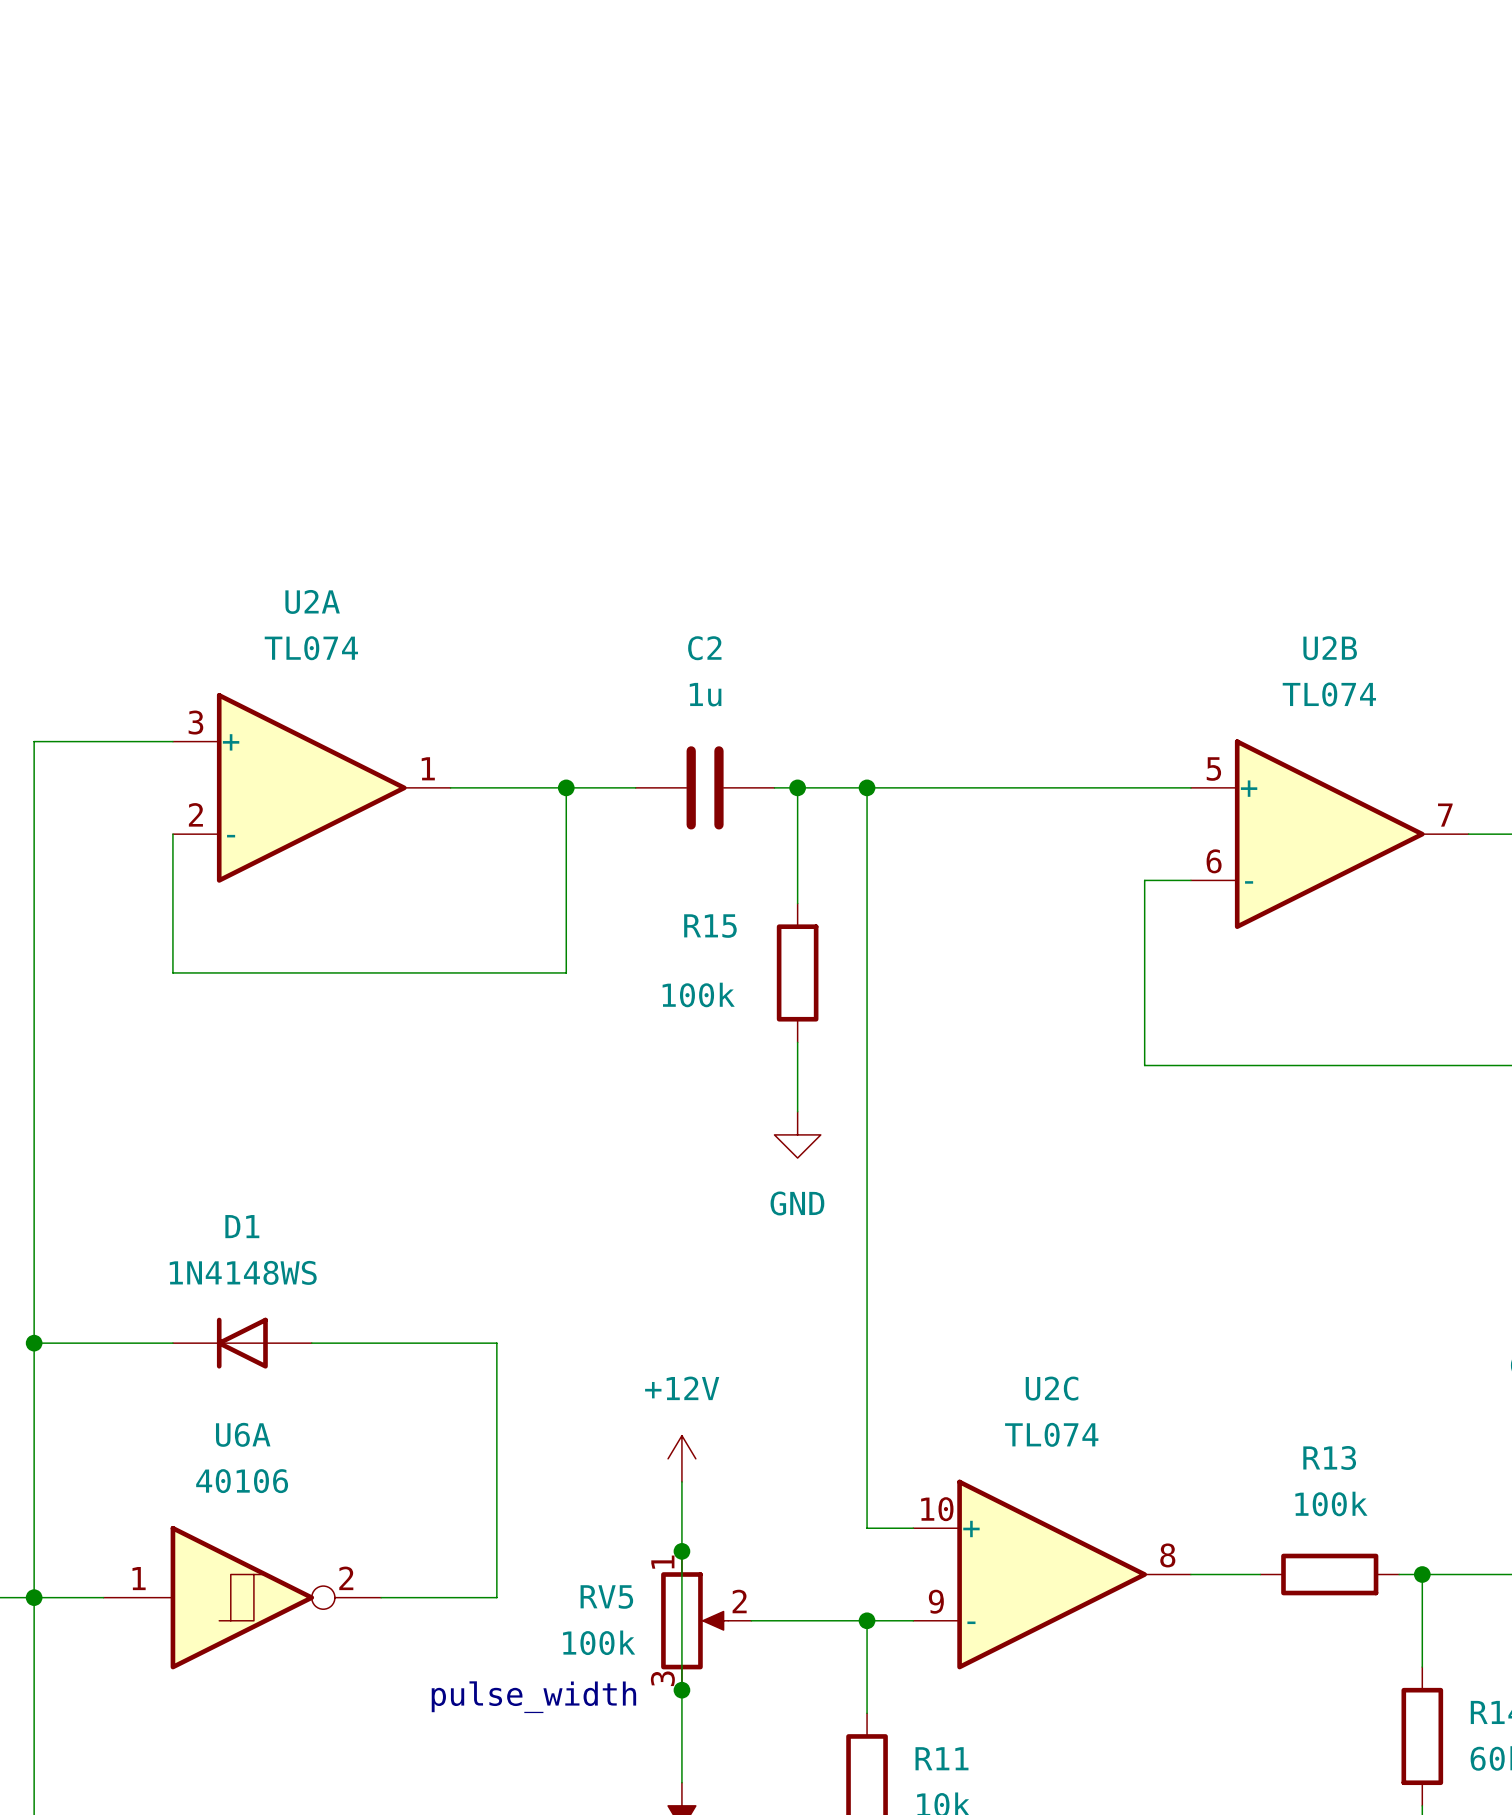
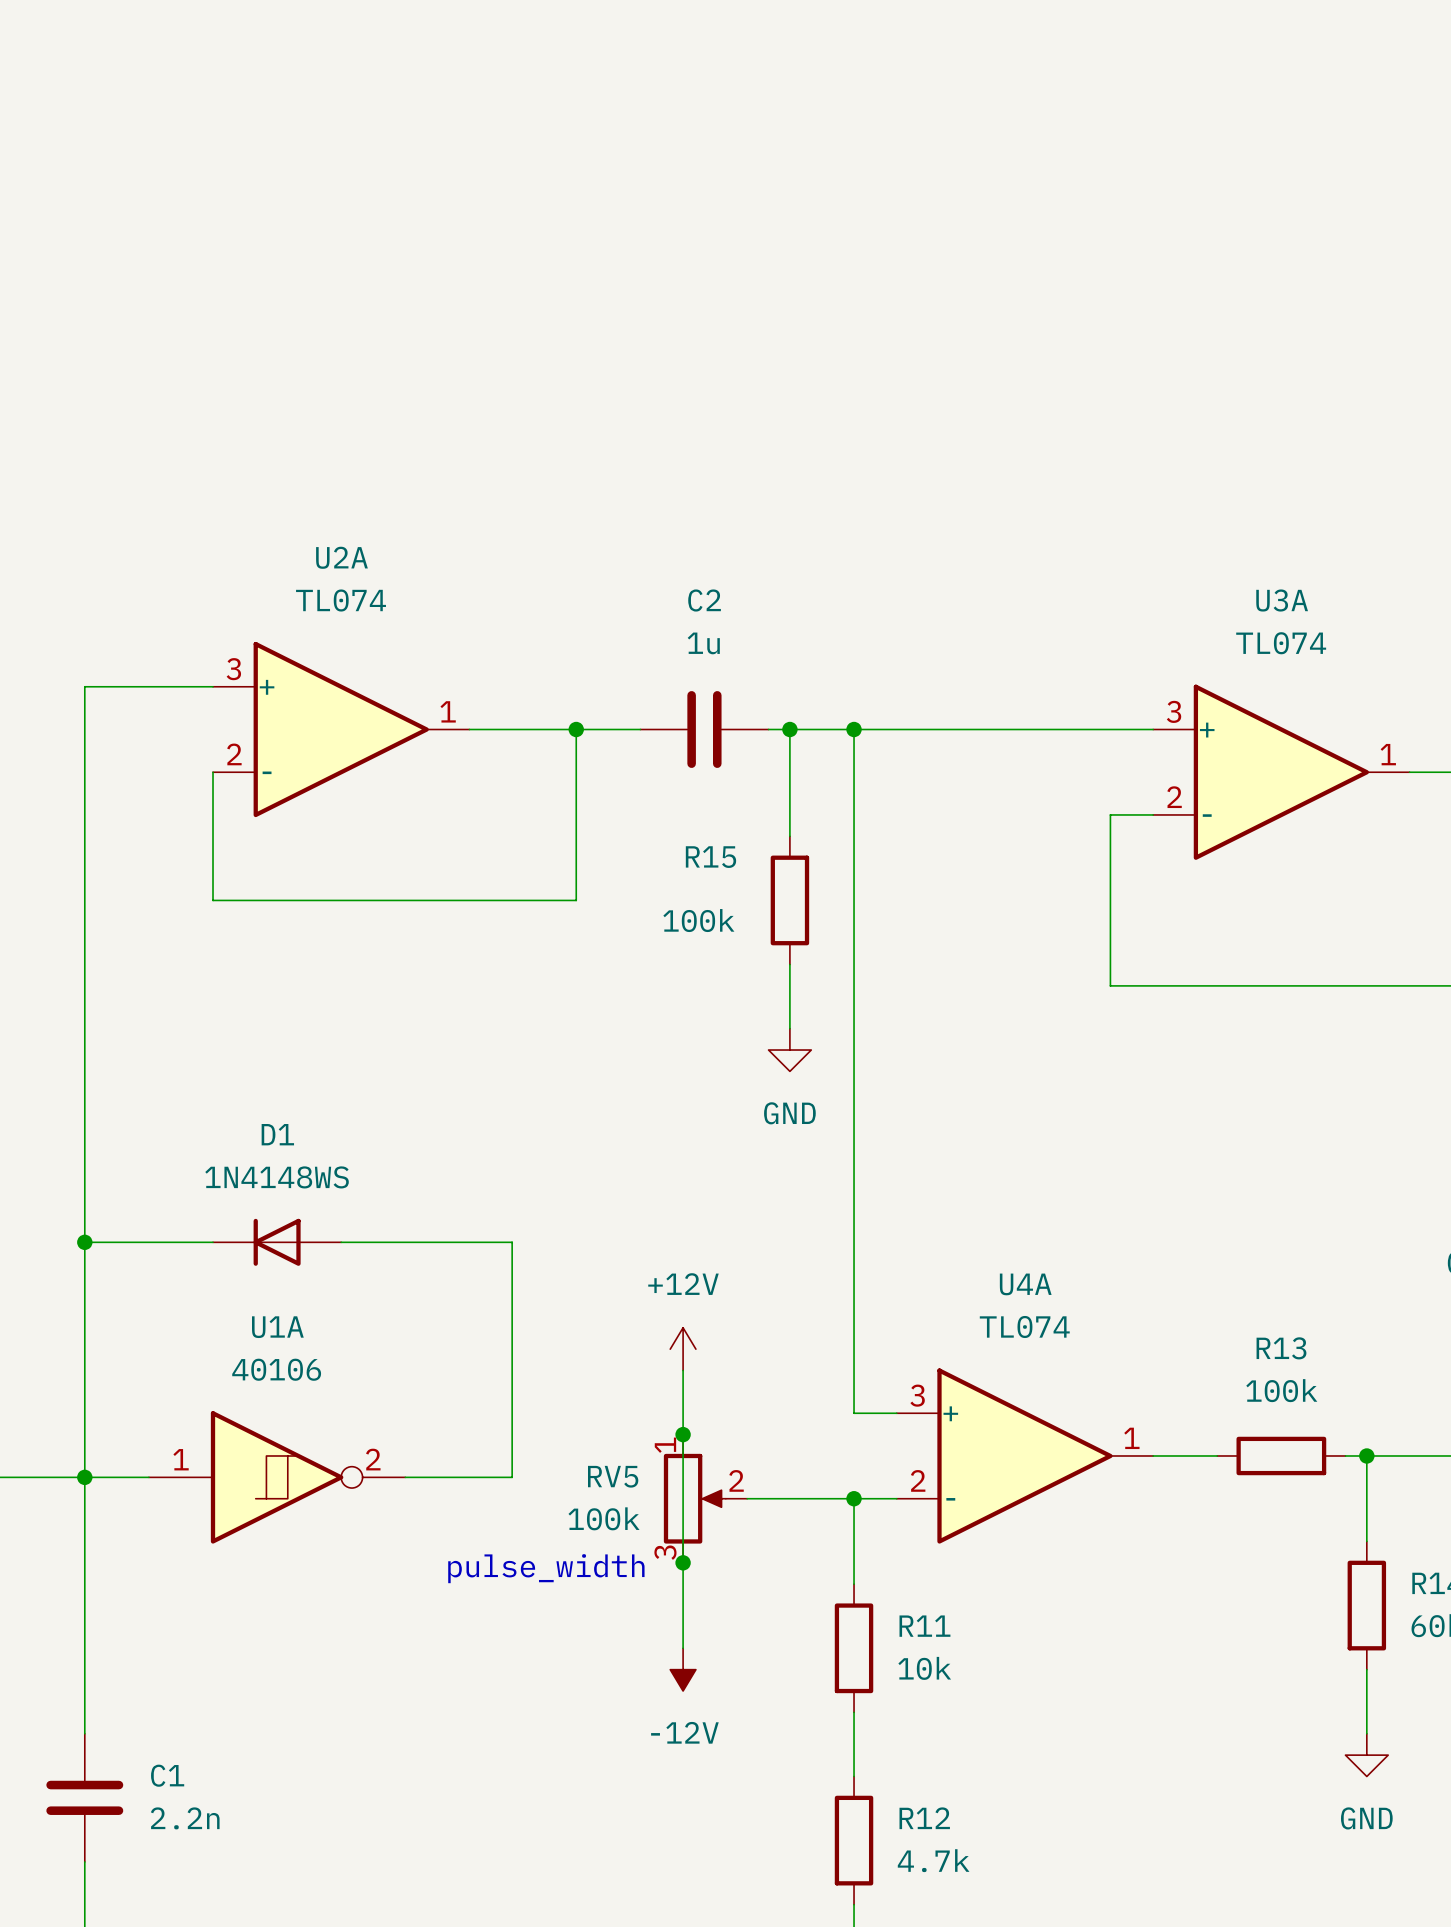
U2B name: U2B (1330, 648) -> U3A (1282, 600)
U2B pin number: 5 (1213, 769) -> 3 (1174, 711)
U2B pin number: 7 (1445, 815) -> 1 (1388, 754)
U2B pin number: 6 (1214, 861) -> 2 (1174, 797)
U2C name: U2C (1052, 1388) -> U4A (1025, 1284)
U6A name: U6A (243, 1434) -> U1A (277, 1327)
U2C pin number: 10 (937, 1509) -> 3 (917, 1395)
U2C pin number: 8 (1167, 1555) -> 1 (1131, 1438)
U2C pin number: 9 (936, 1601) -> 2 (918, 1480)

